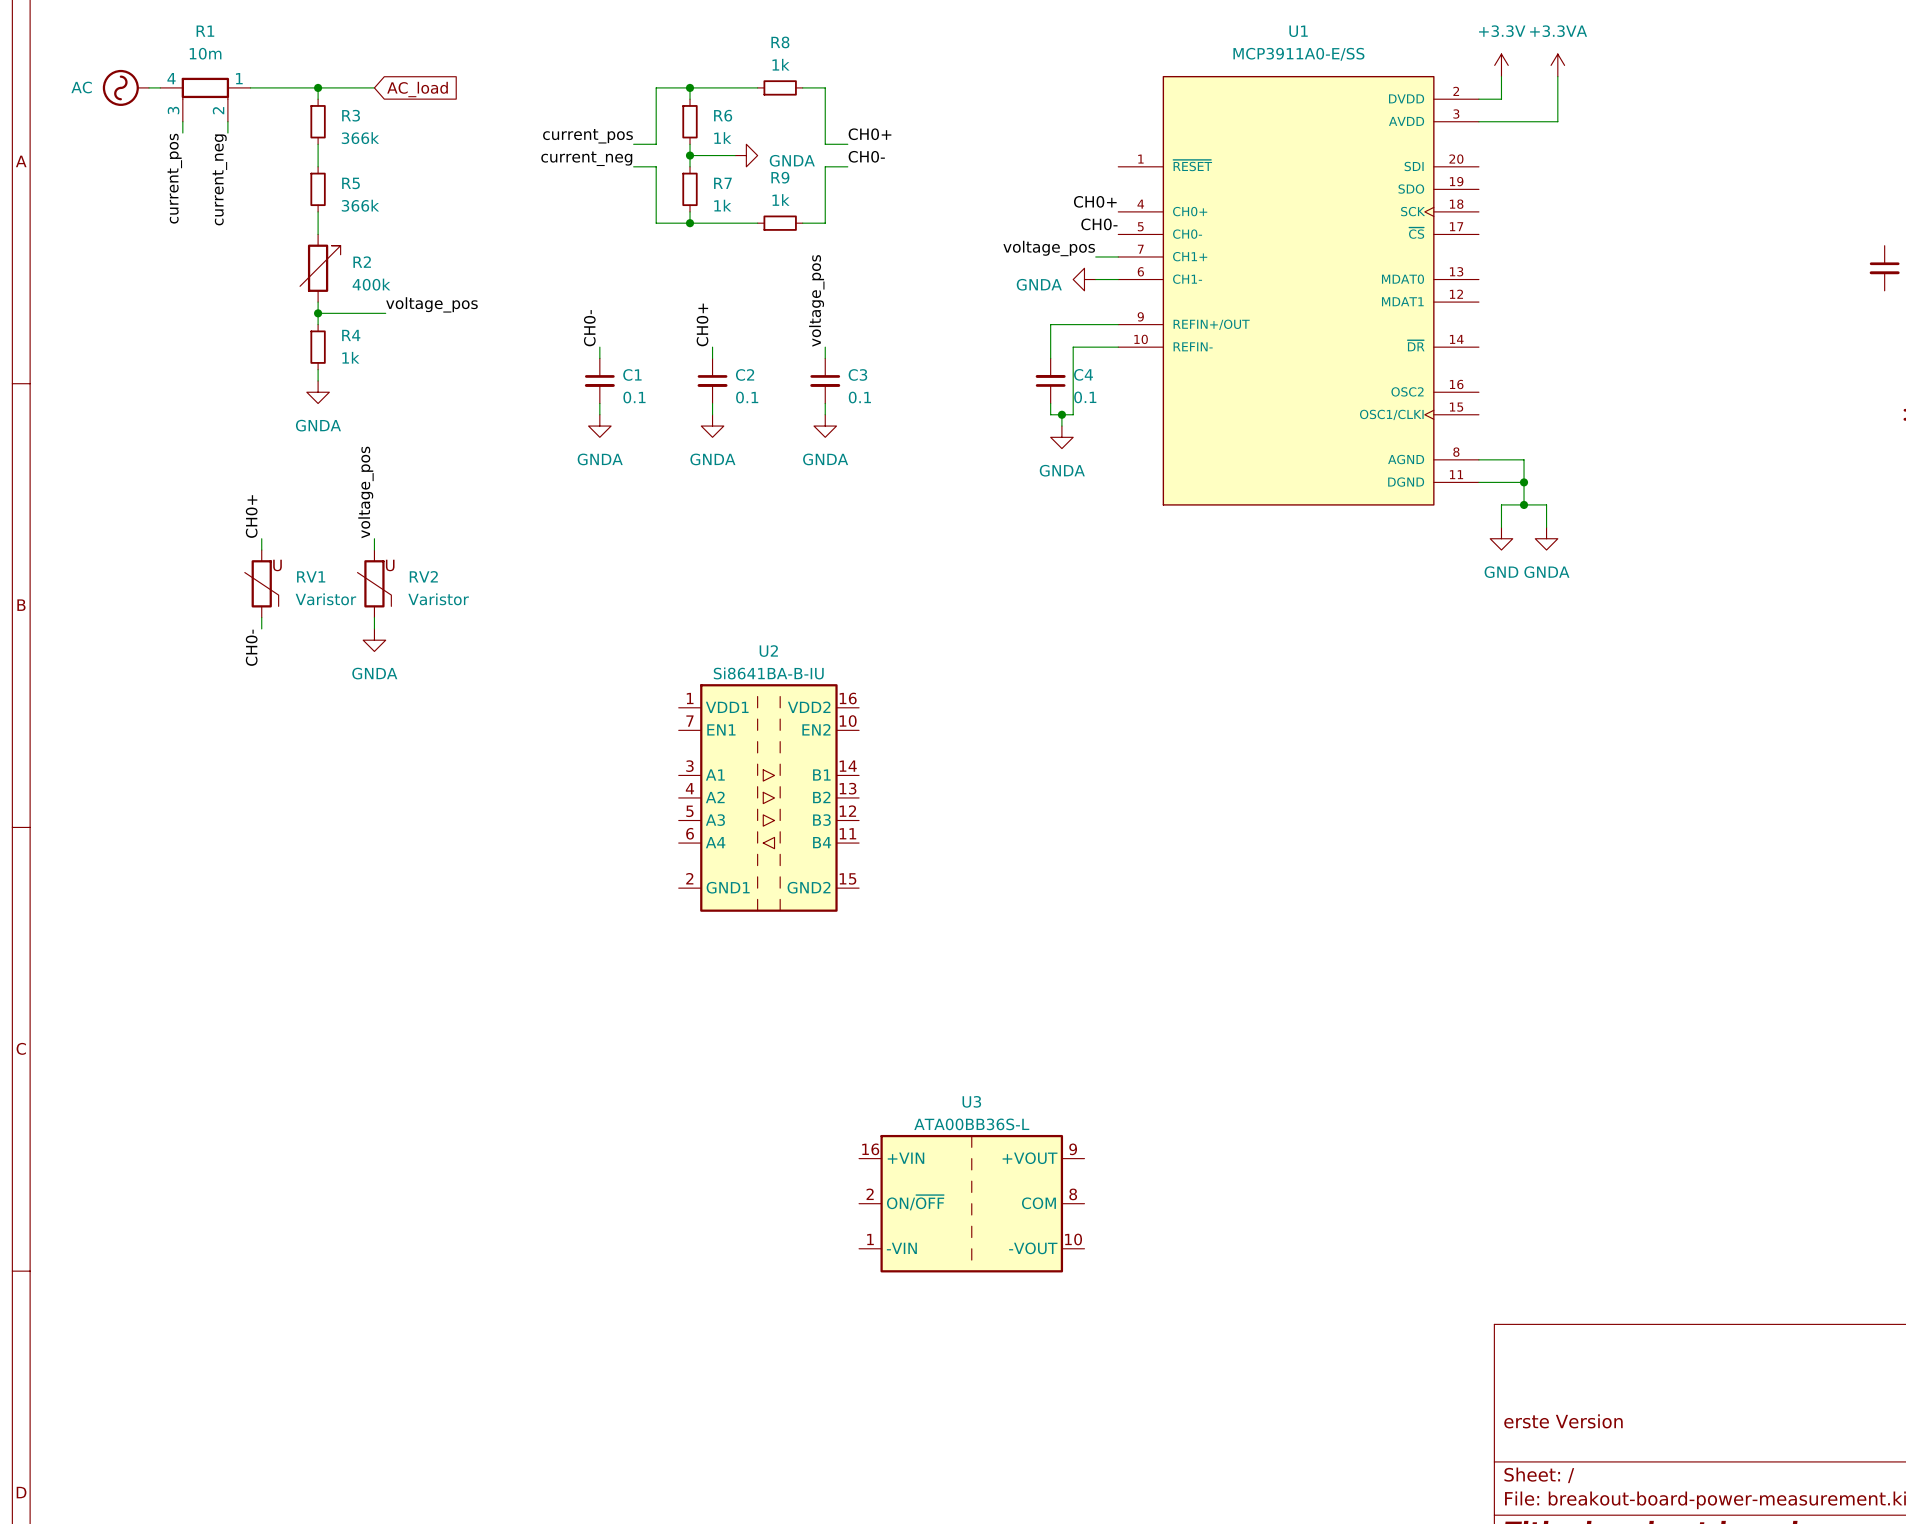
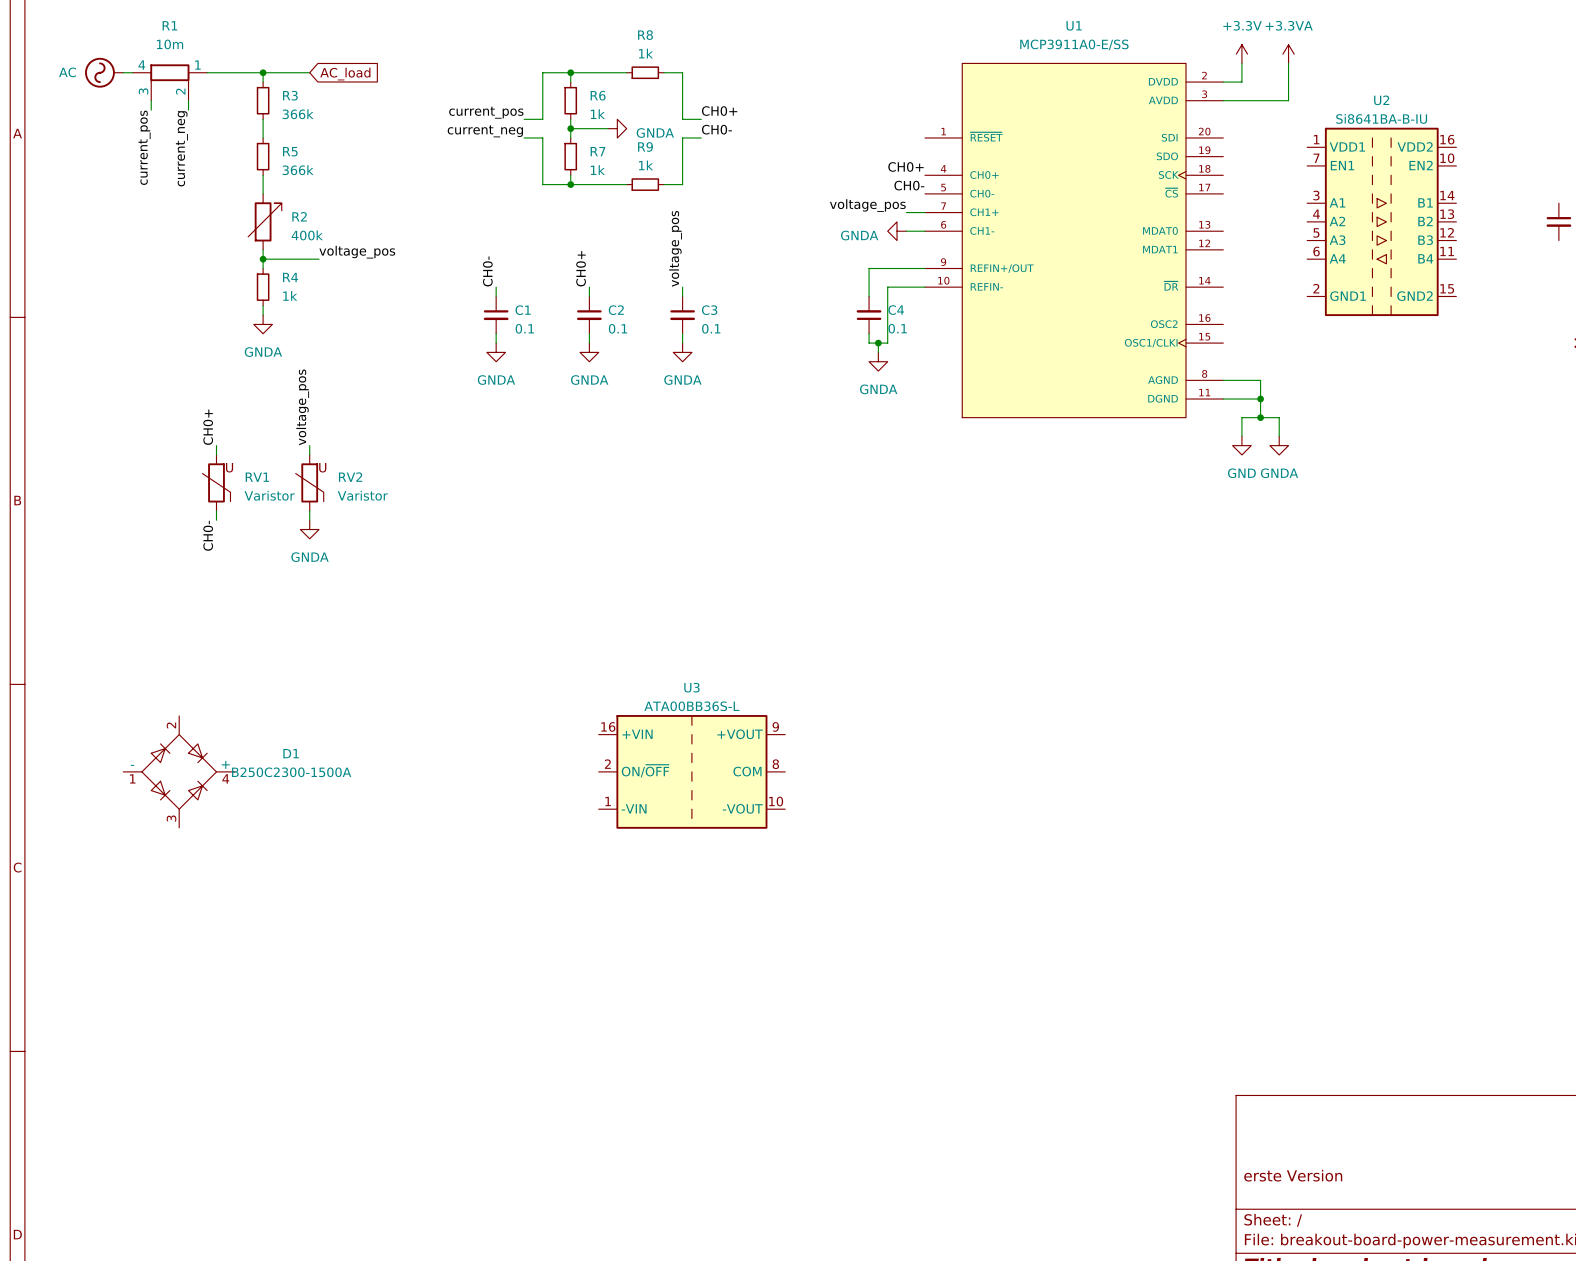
U2 position: (768, 797) -> (1381, 221)
D1: none -> B250C2300-1500A (179, 771)
U3 position: (971, 1203) -> (691, 771)

